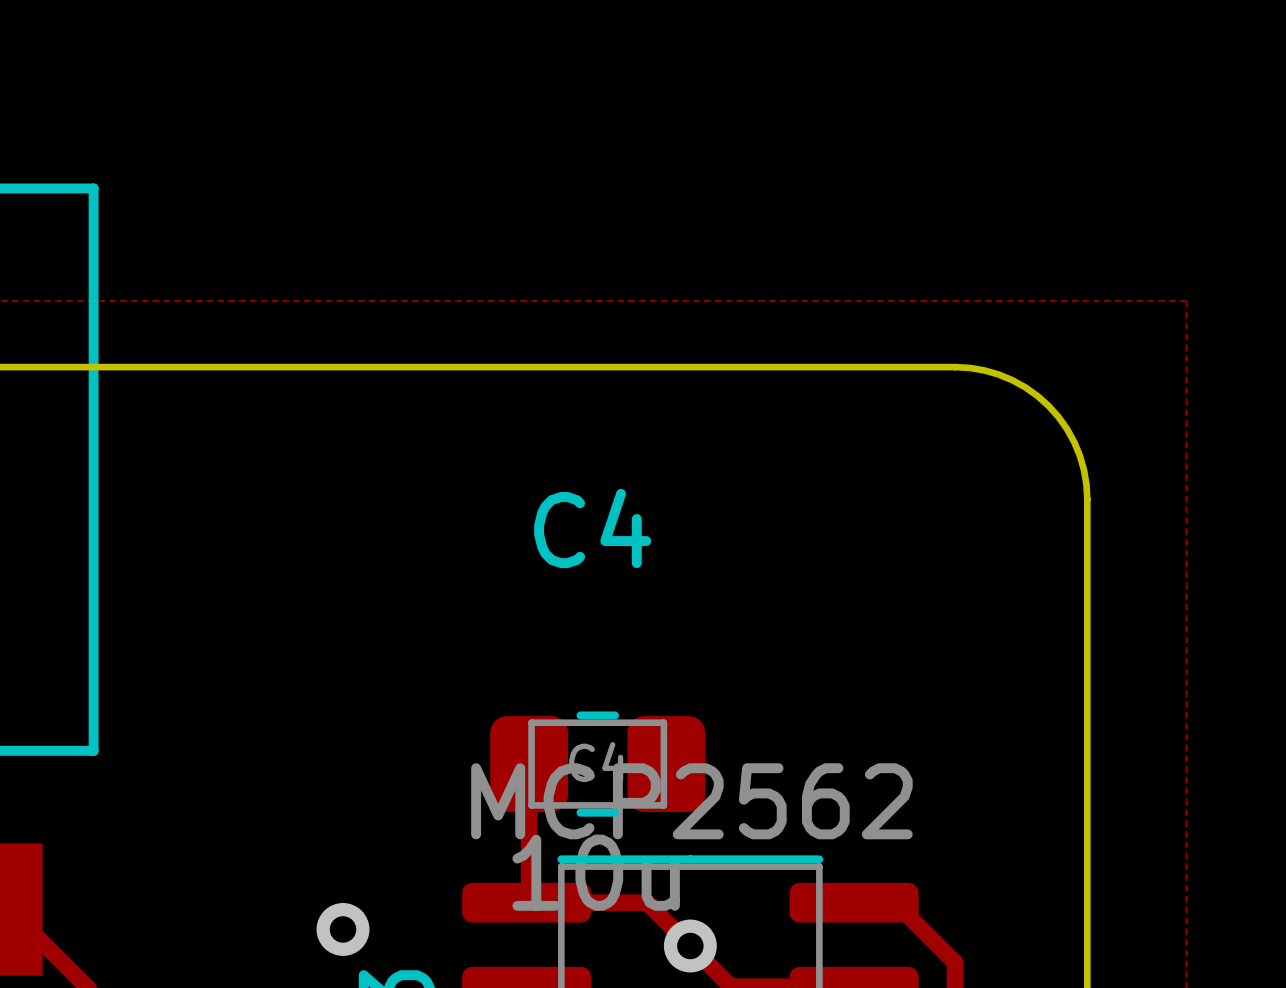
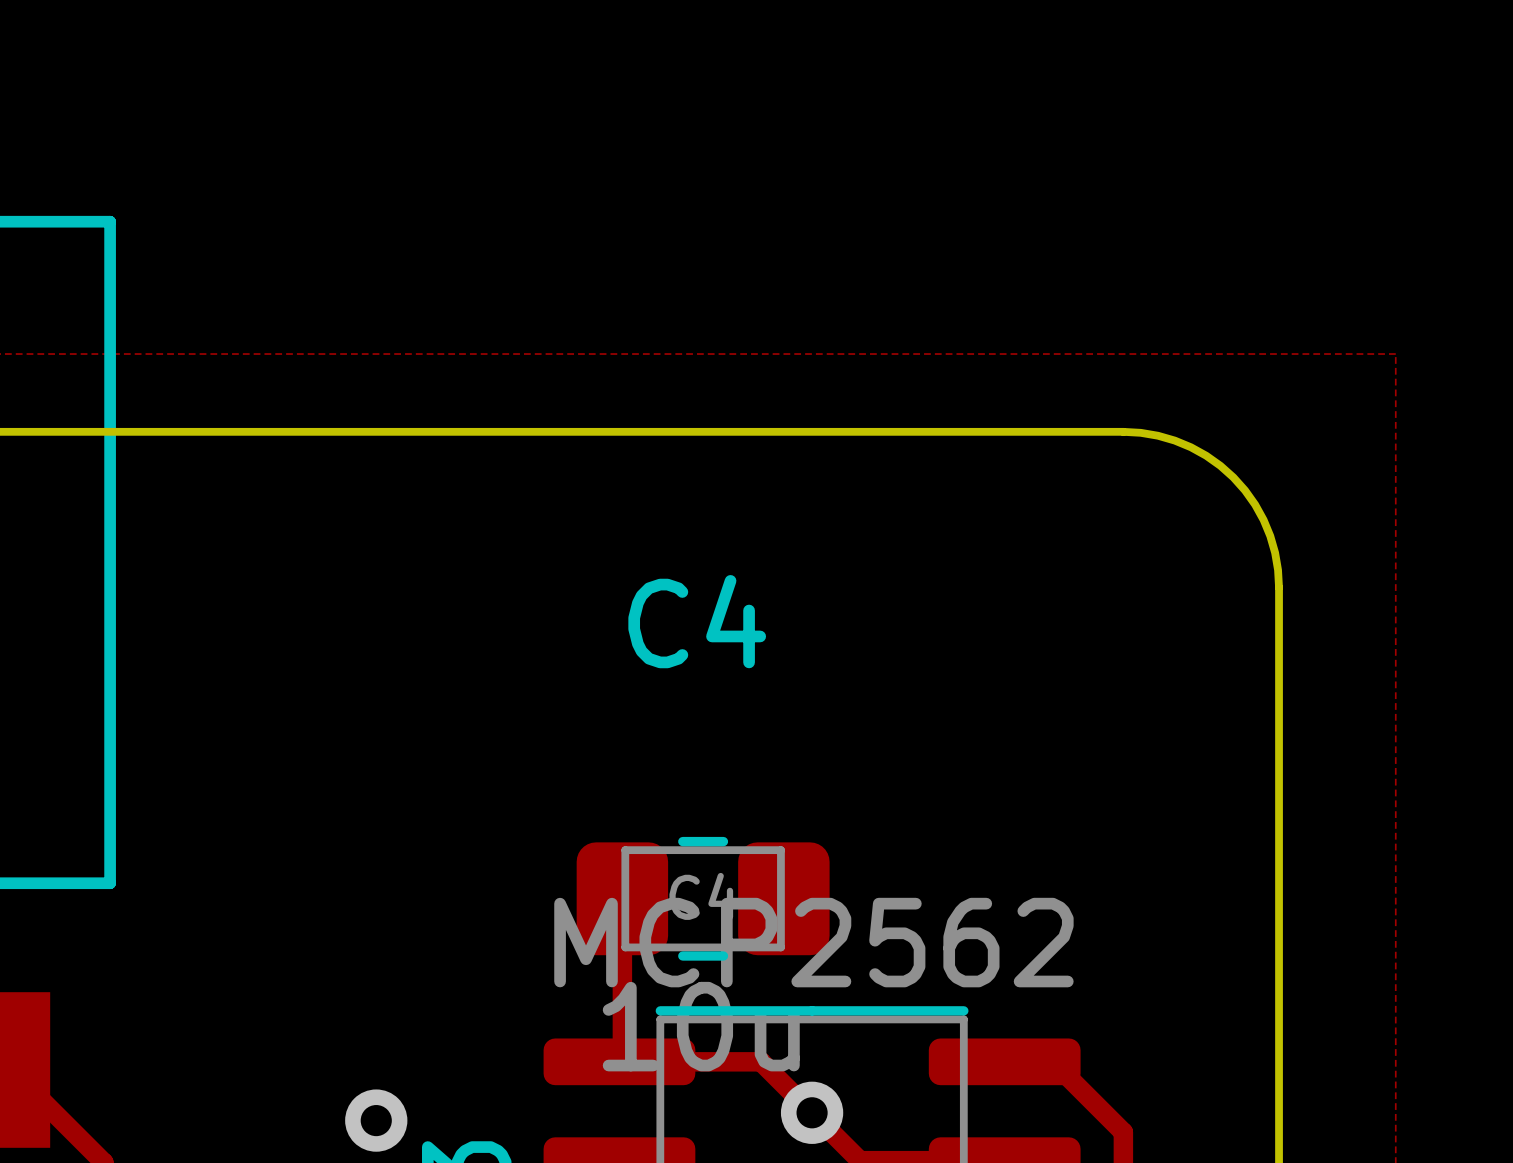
via position: (343, 929) -> (376, 1120)

